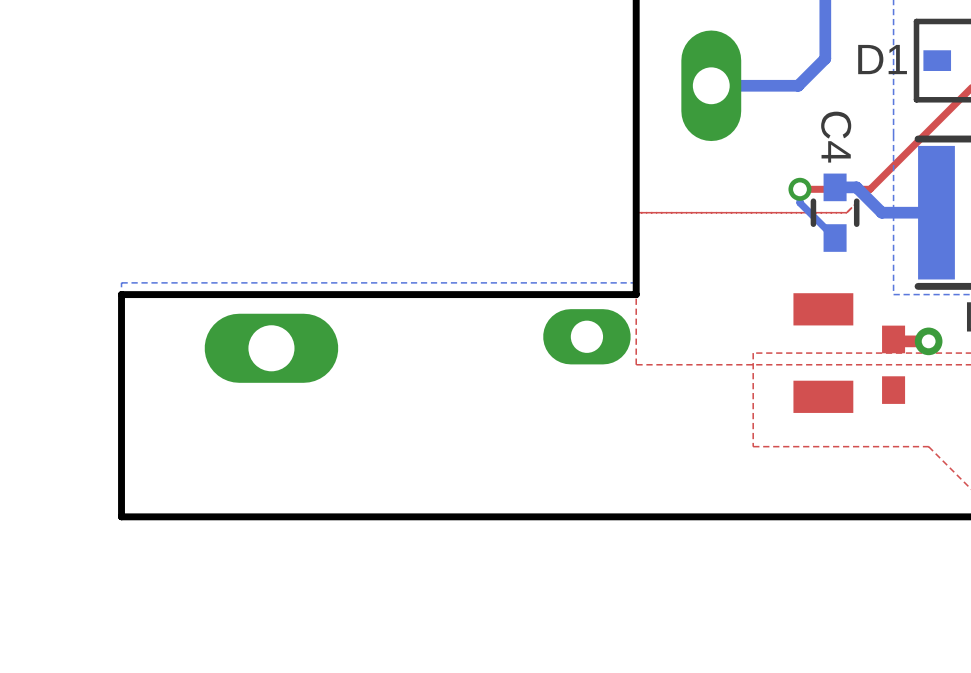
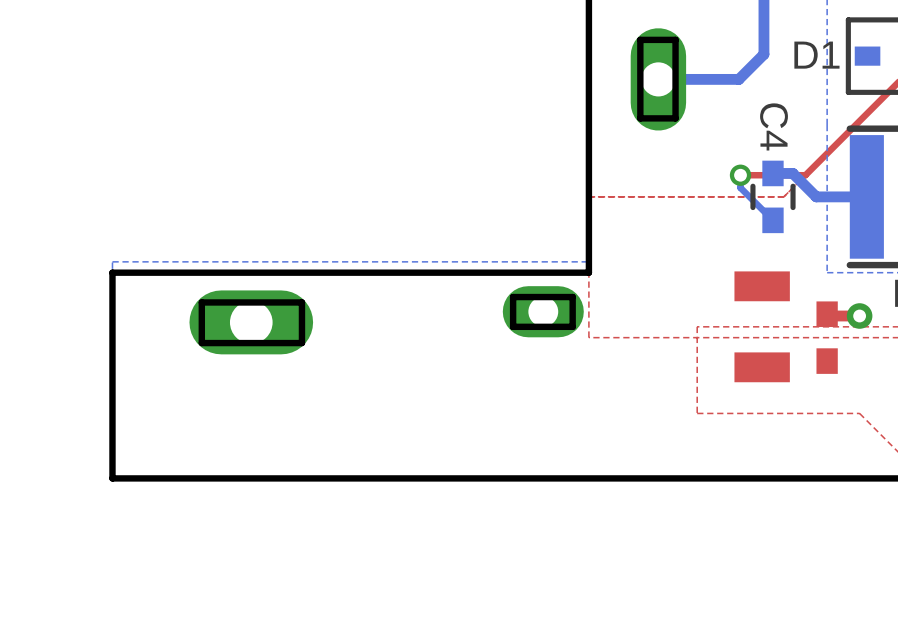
board edge: none -> (675, 39) (675, 118) (640, 118) (640, 39) (675, 39)
board edge: none -> (572, 297) (572, 326) (513, 326) (513, 297) (572, 297)
board edge: none -> (301, 302) (301, 343) (201, 343) (201, 302) (301, 302)

